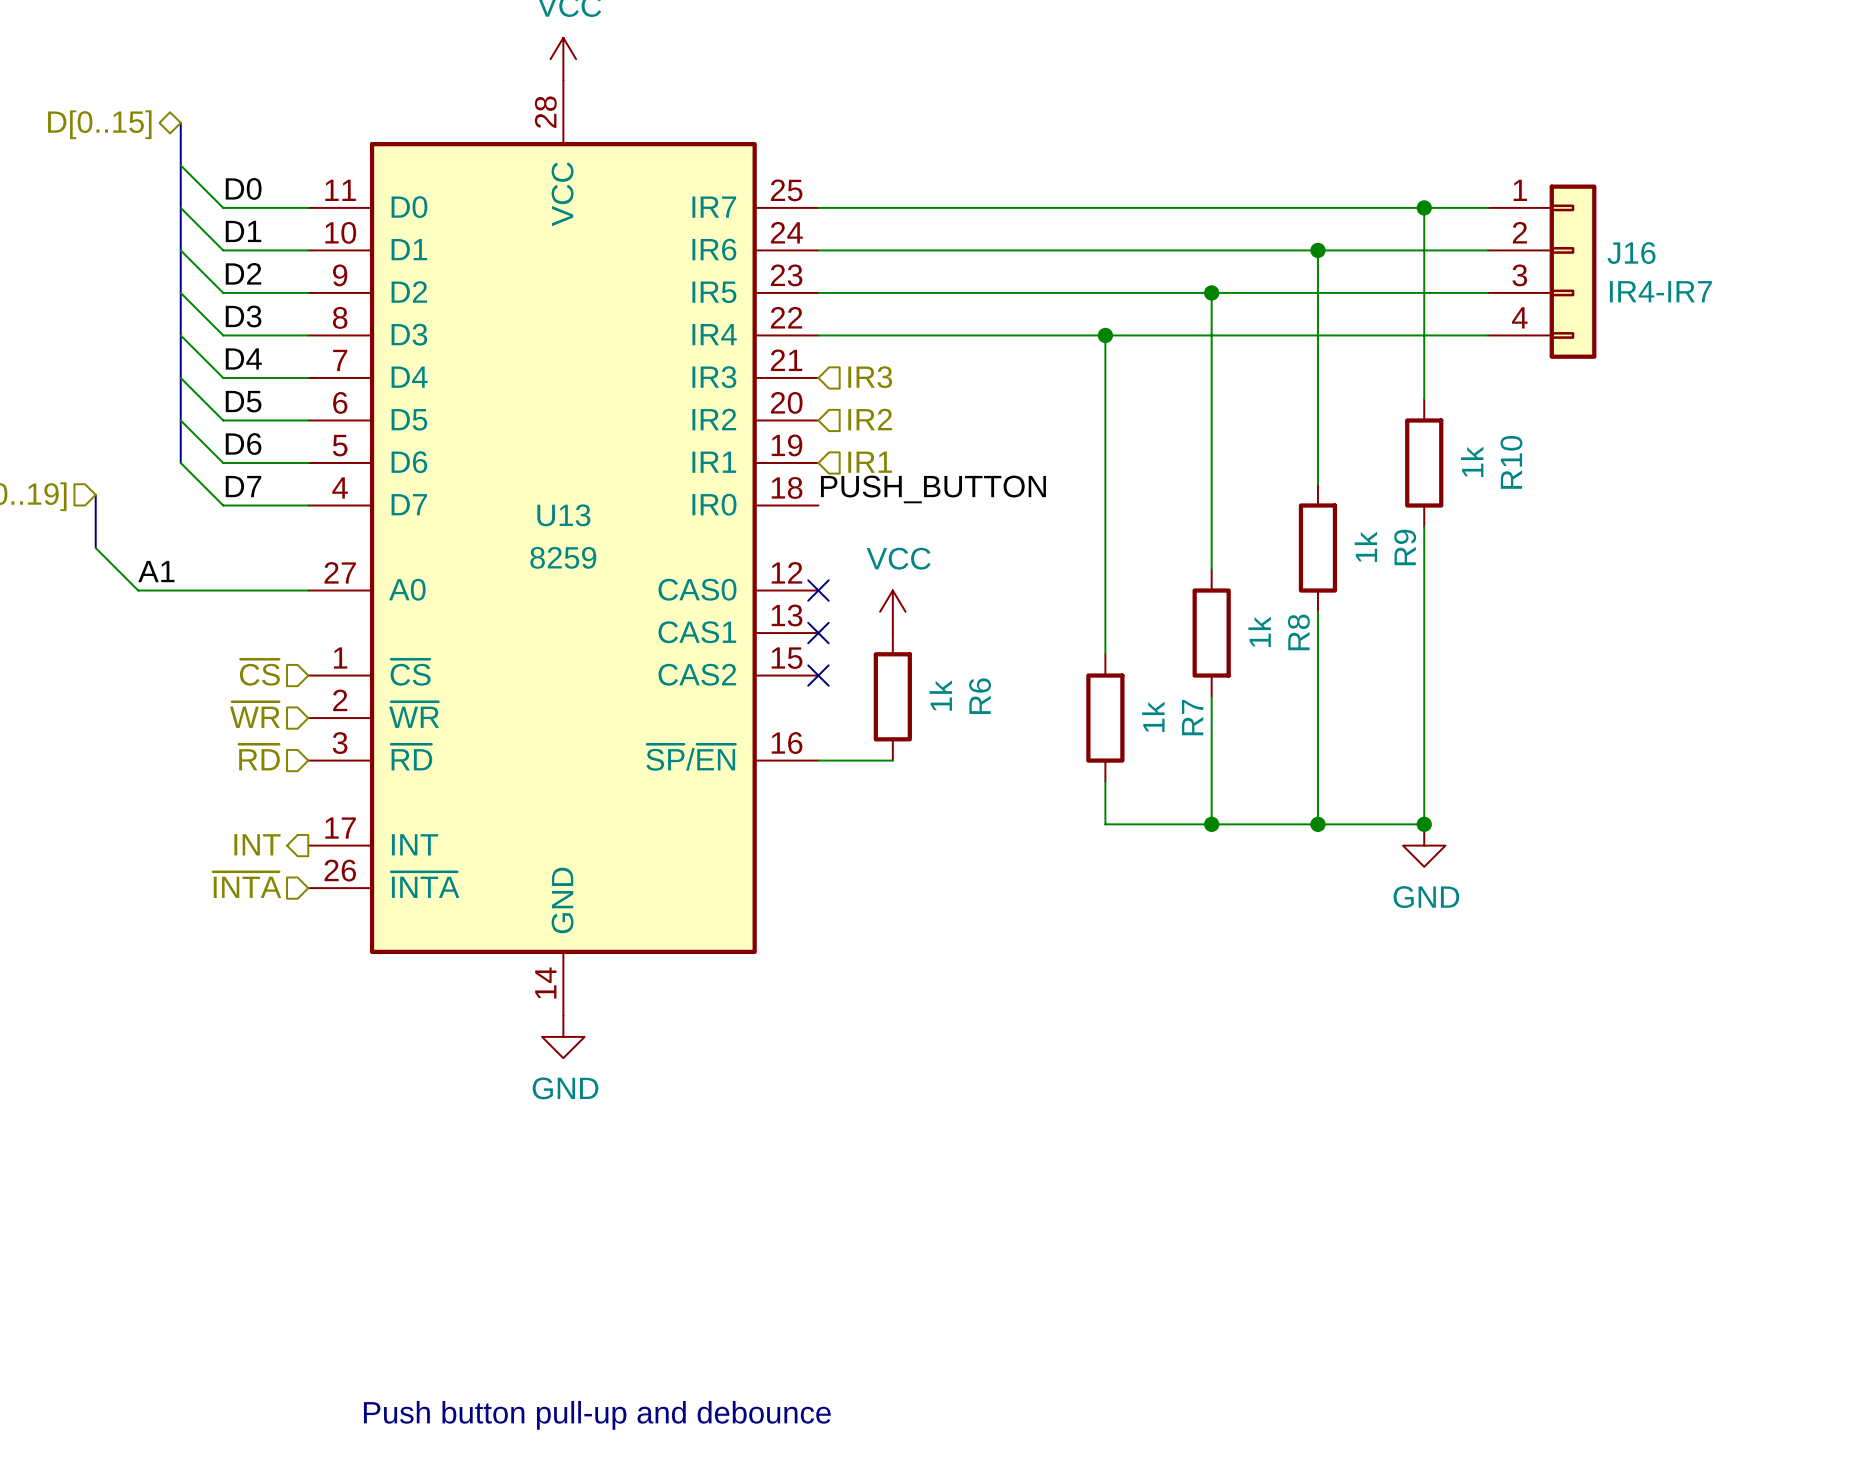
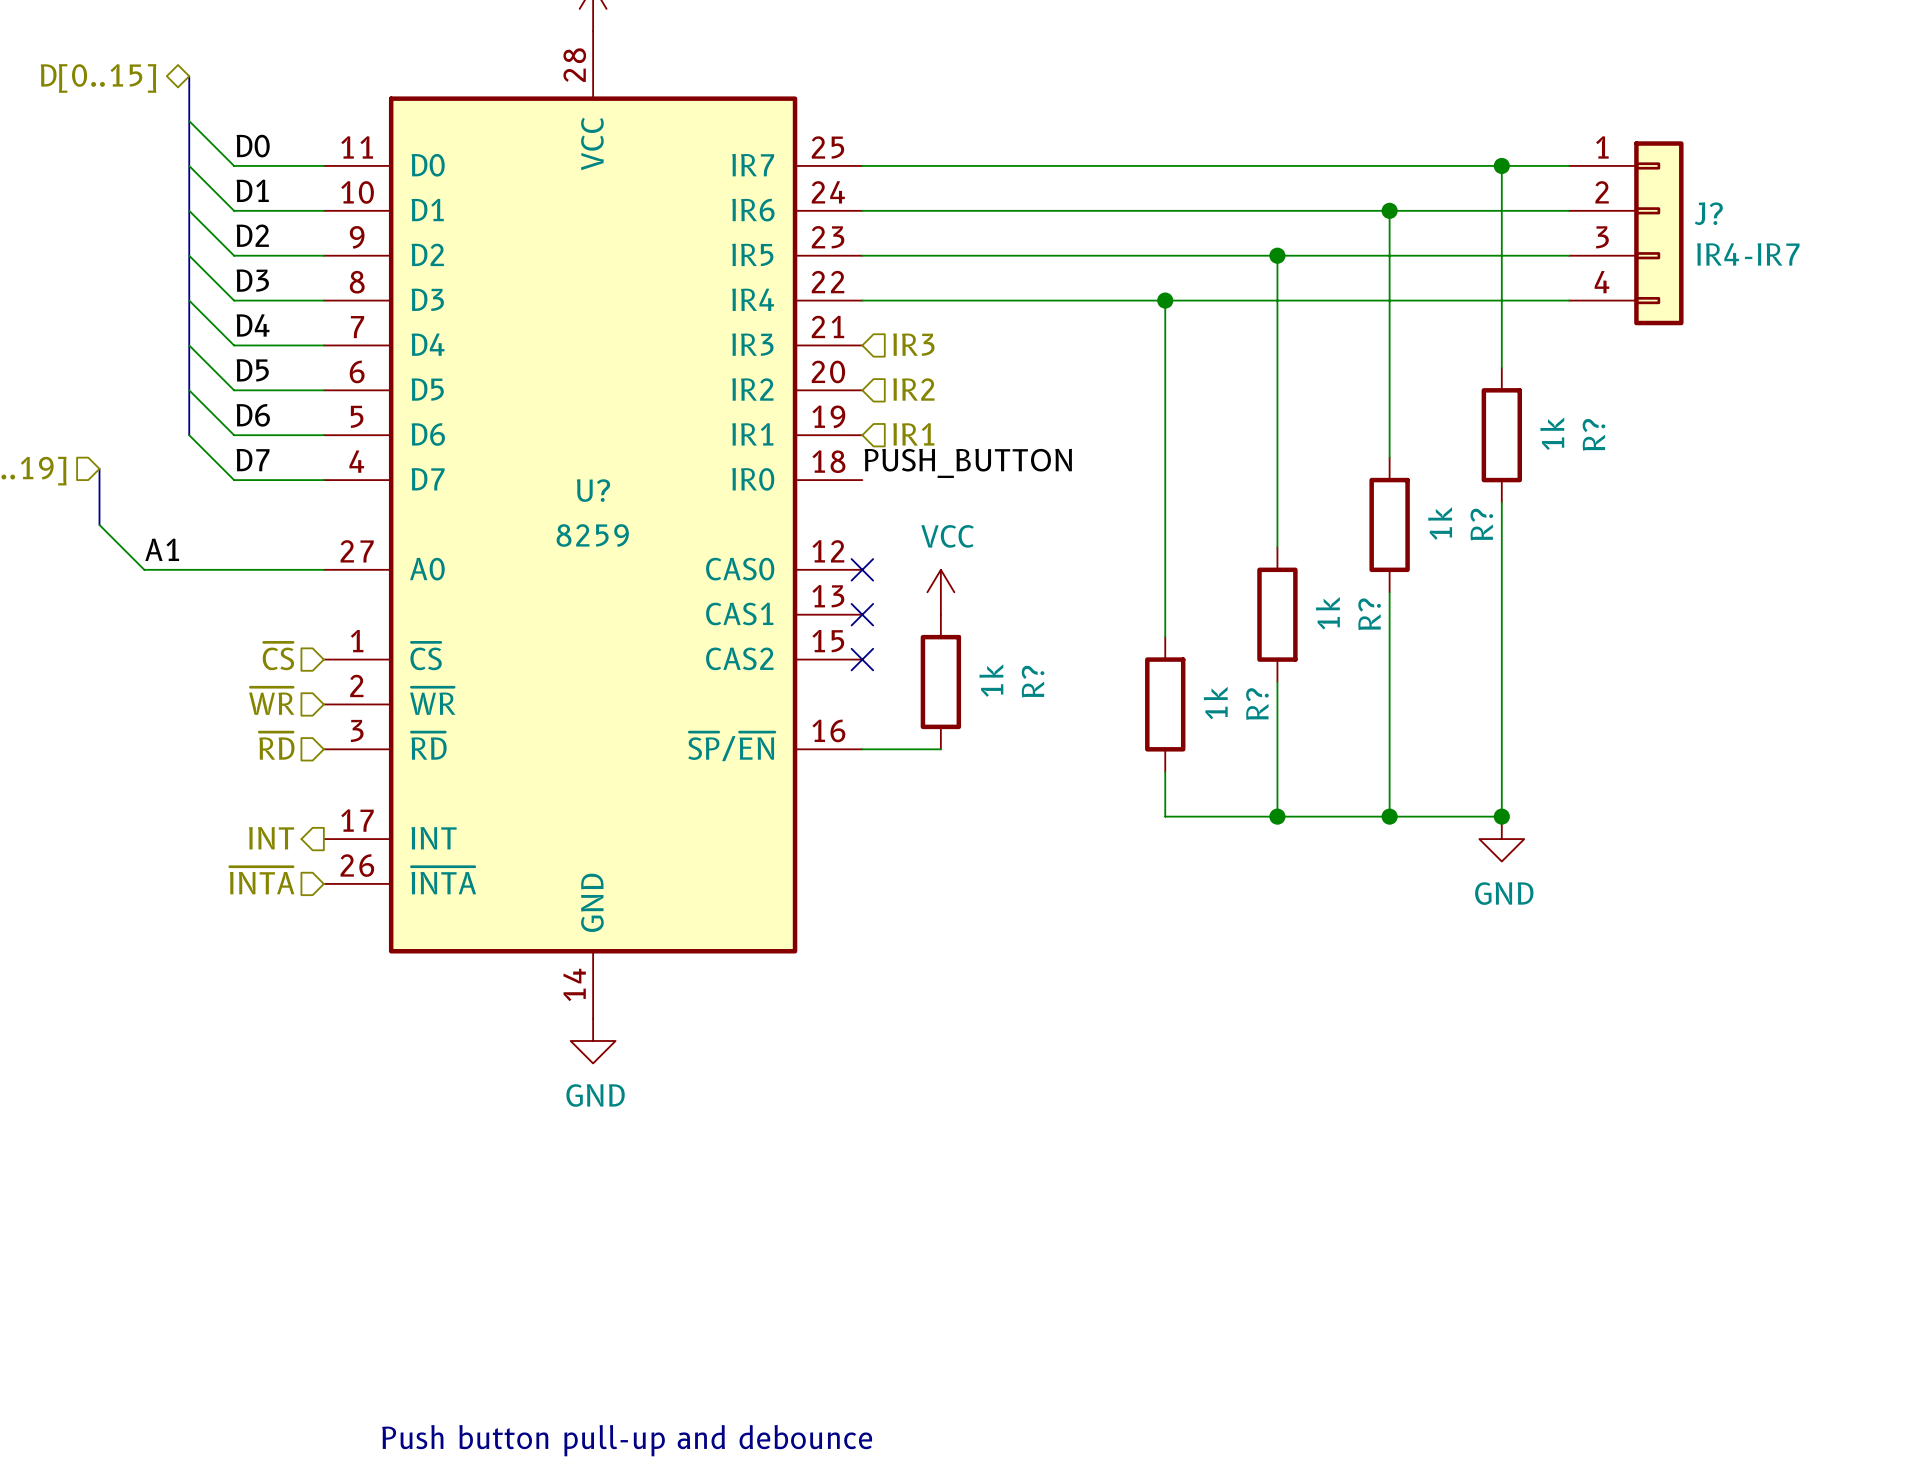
J16 name: J16 (1631, 253) -> J? (1708, 213)
R10 name: R10 (1511, 462) -> R? (1593, 434)
U13 name: U13 (563, 515) -> U? (593, 490)
R9 name: R9 (1405, 547) -> R? (1481, 524)
R8 name: R8 (1298, 632) -> R? (1369, 614)
R6 name: R6 (980, 696) -> R? (1033, 681)
R7 name: R7 (1192, 717) -> R? (1257, 704)

